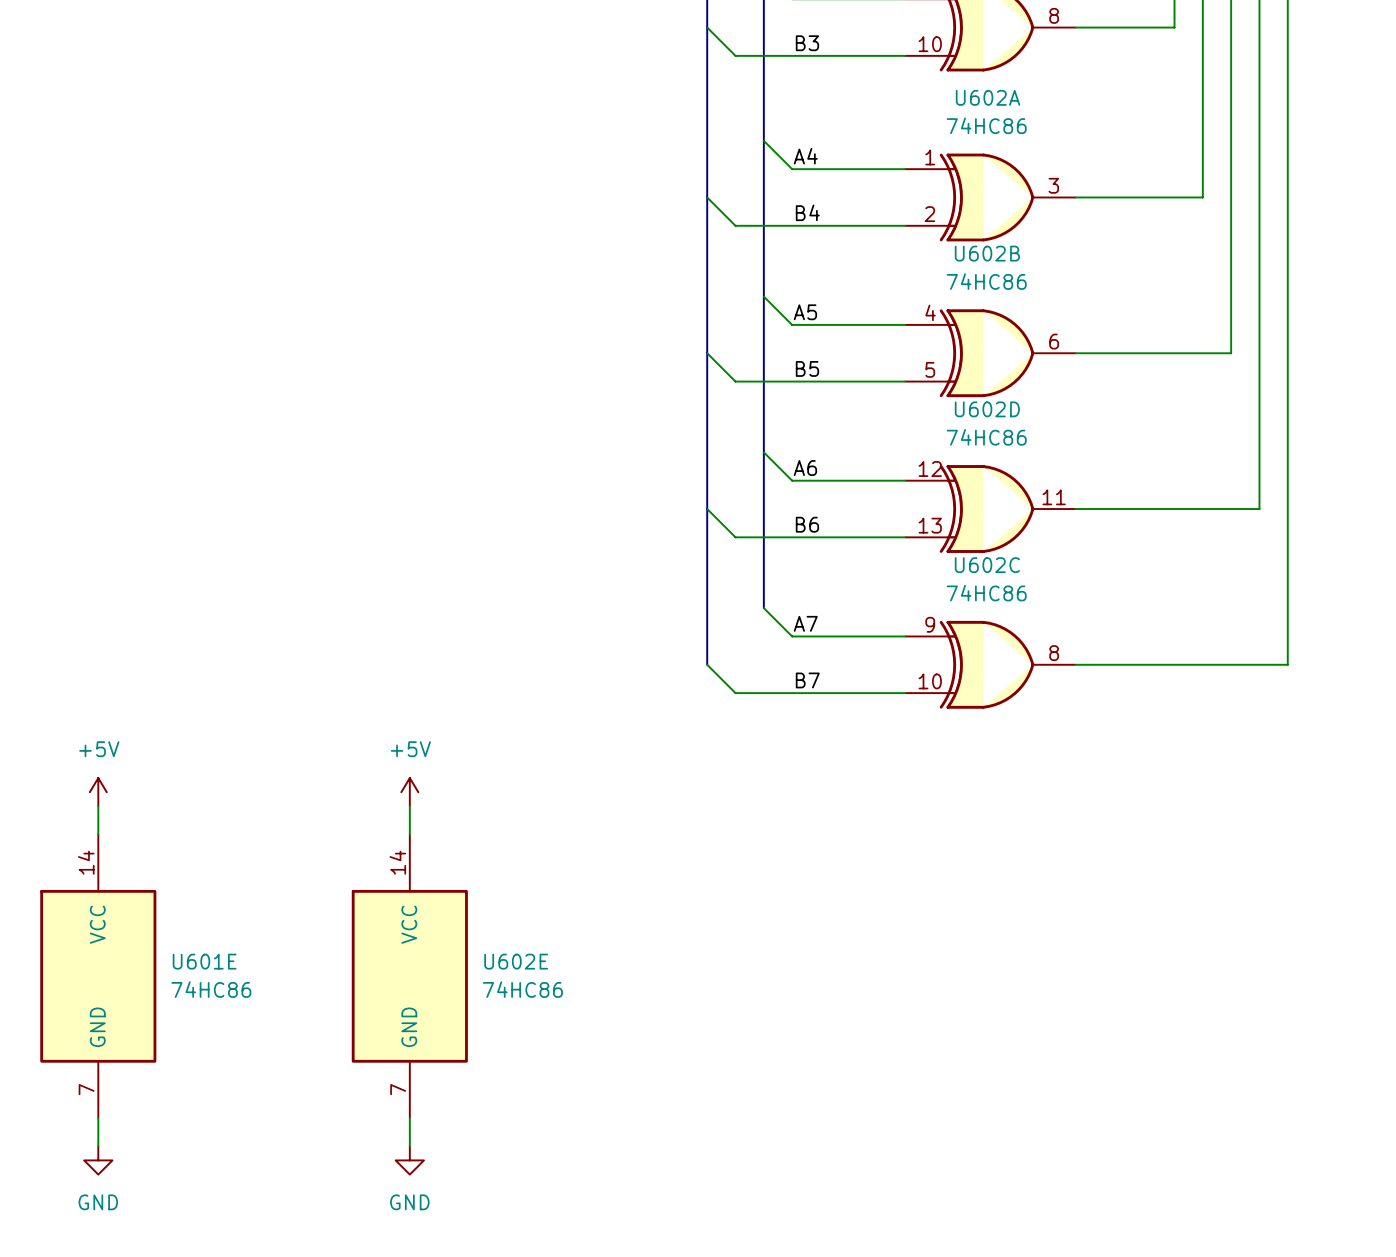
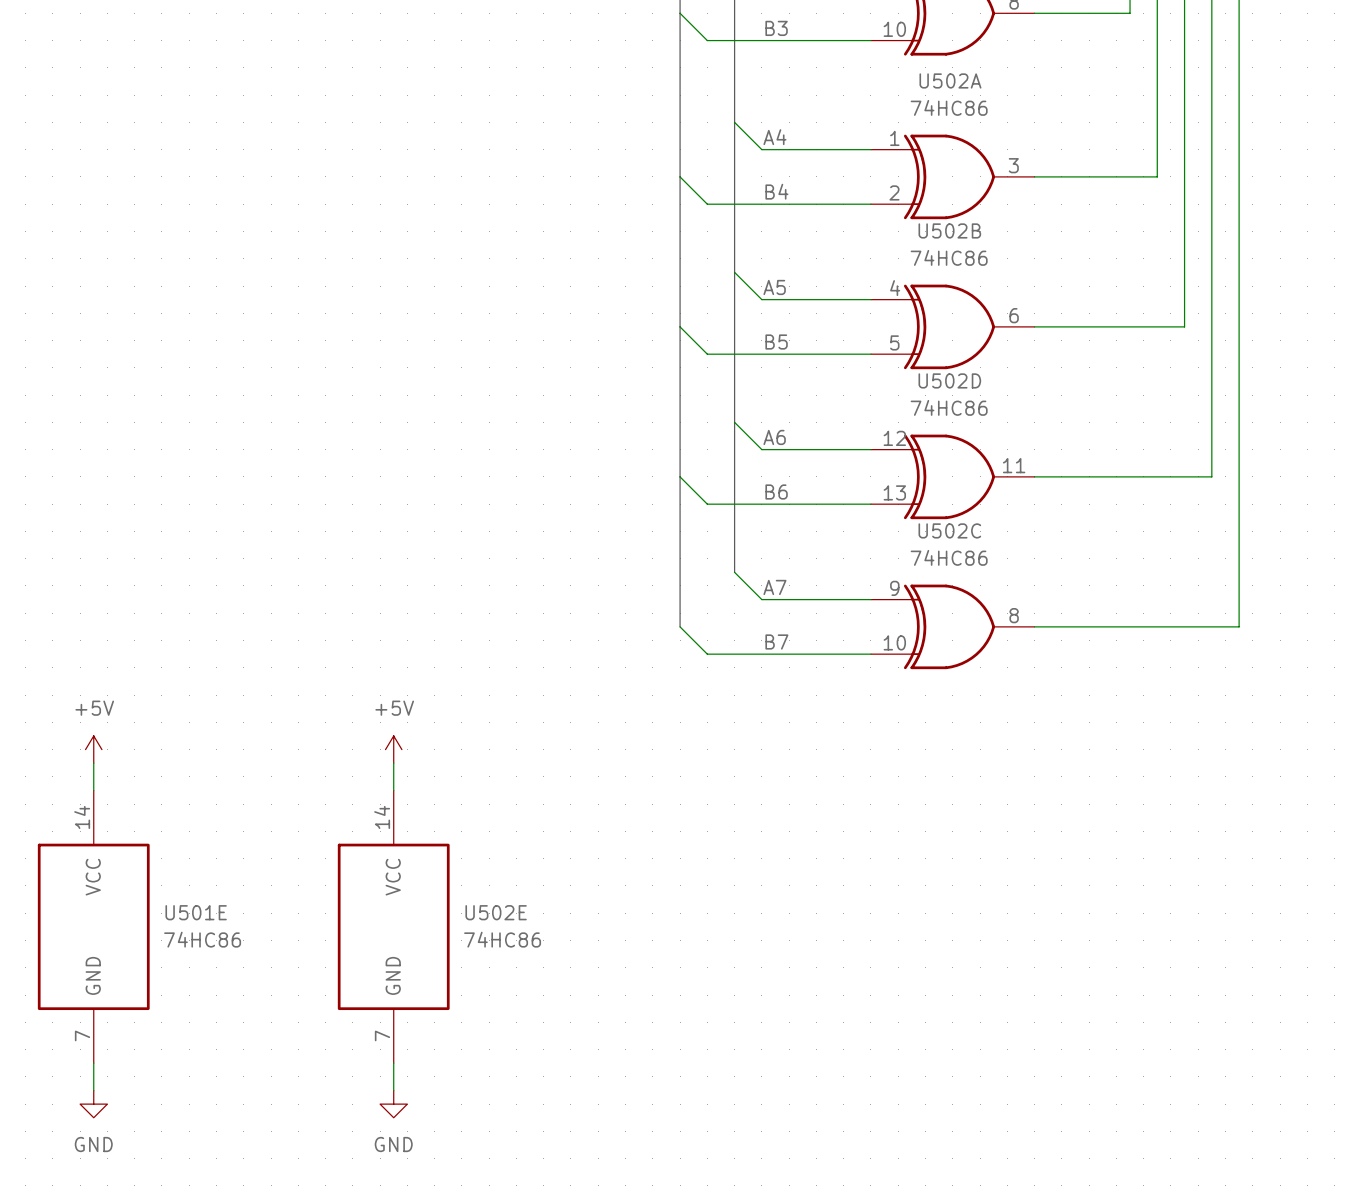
U602A name: U602A (988, 97) -> U502A (950, 80)
U602B name: U602B (987, 253) -> U502B (949, 230)
U602D name: U602D (987, 409) -> U502D (949, 380)
U602C name: U602C (987, 565) -> U502C (949, 530)
U601E name: U601E (204, 961) -> U501E (196, 912)
U602E name: U602E (516, 961) -> U502E (496, 912)

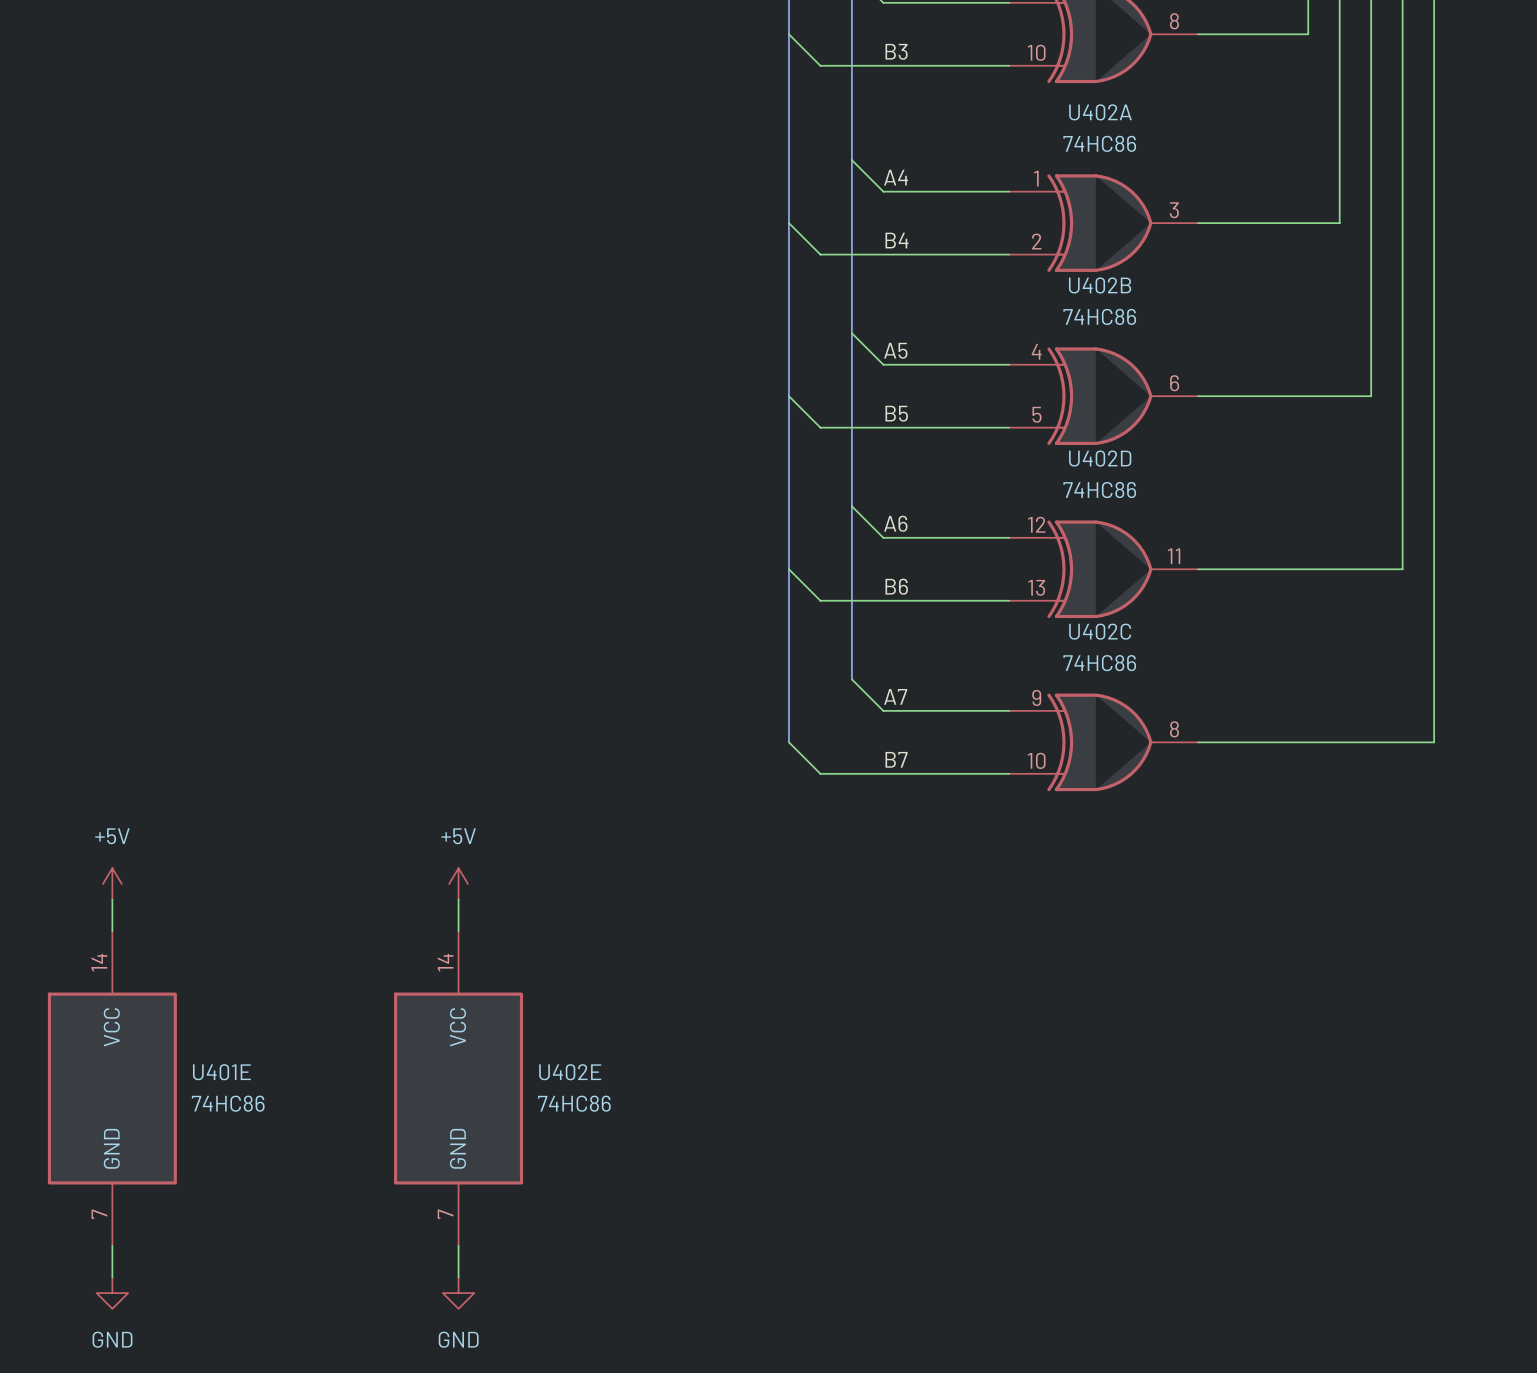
U502A name: U502A (950, 80) -> U402A (1100, 112)
U502B name: U502B (949, 230) -> U402B (1100, 285)
U502D name: U502D (949, 380) -> U402D (1100, 458)
U502C name: U502C (949, 530) -> U402C (1100, 631)
U501E name: U501E (196, 912) -> U401E (221, 1072)
U502E name: U502E (496, 912) -> U402E (570, 1072)

